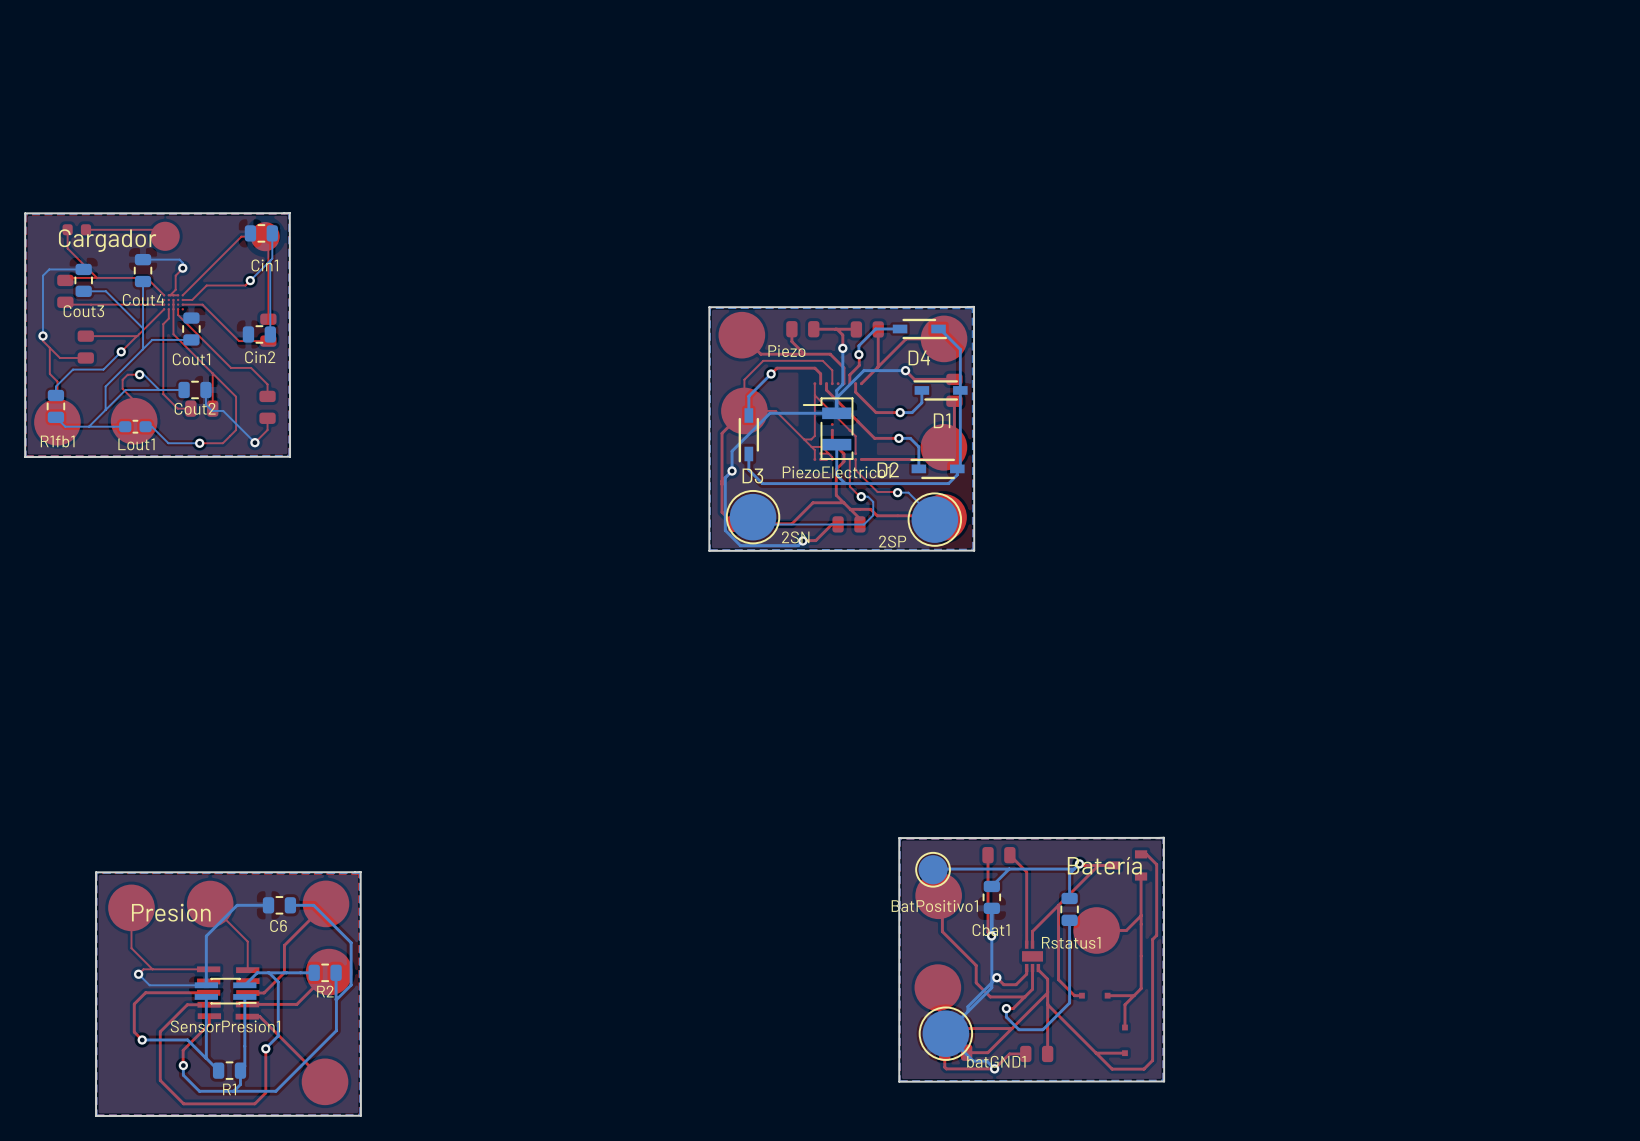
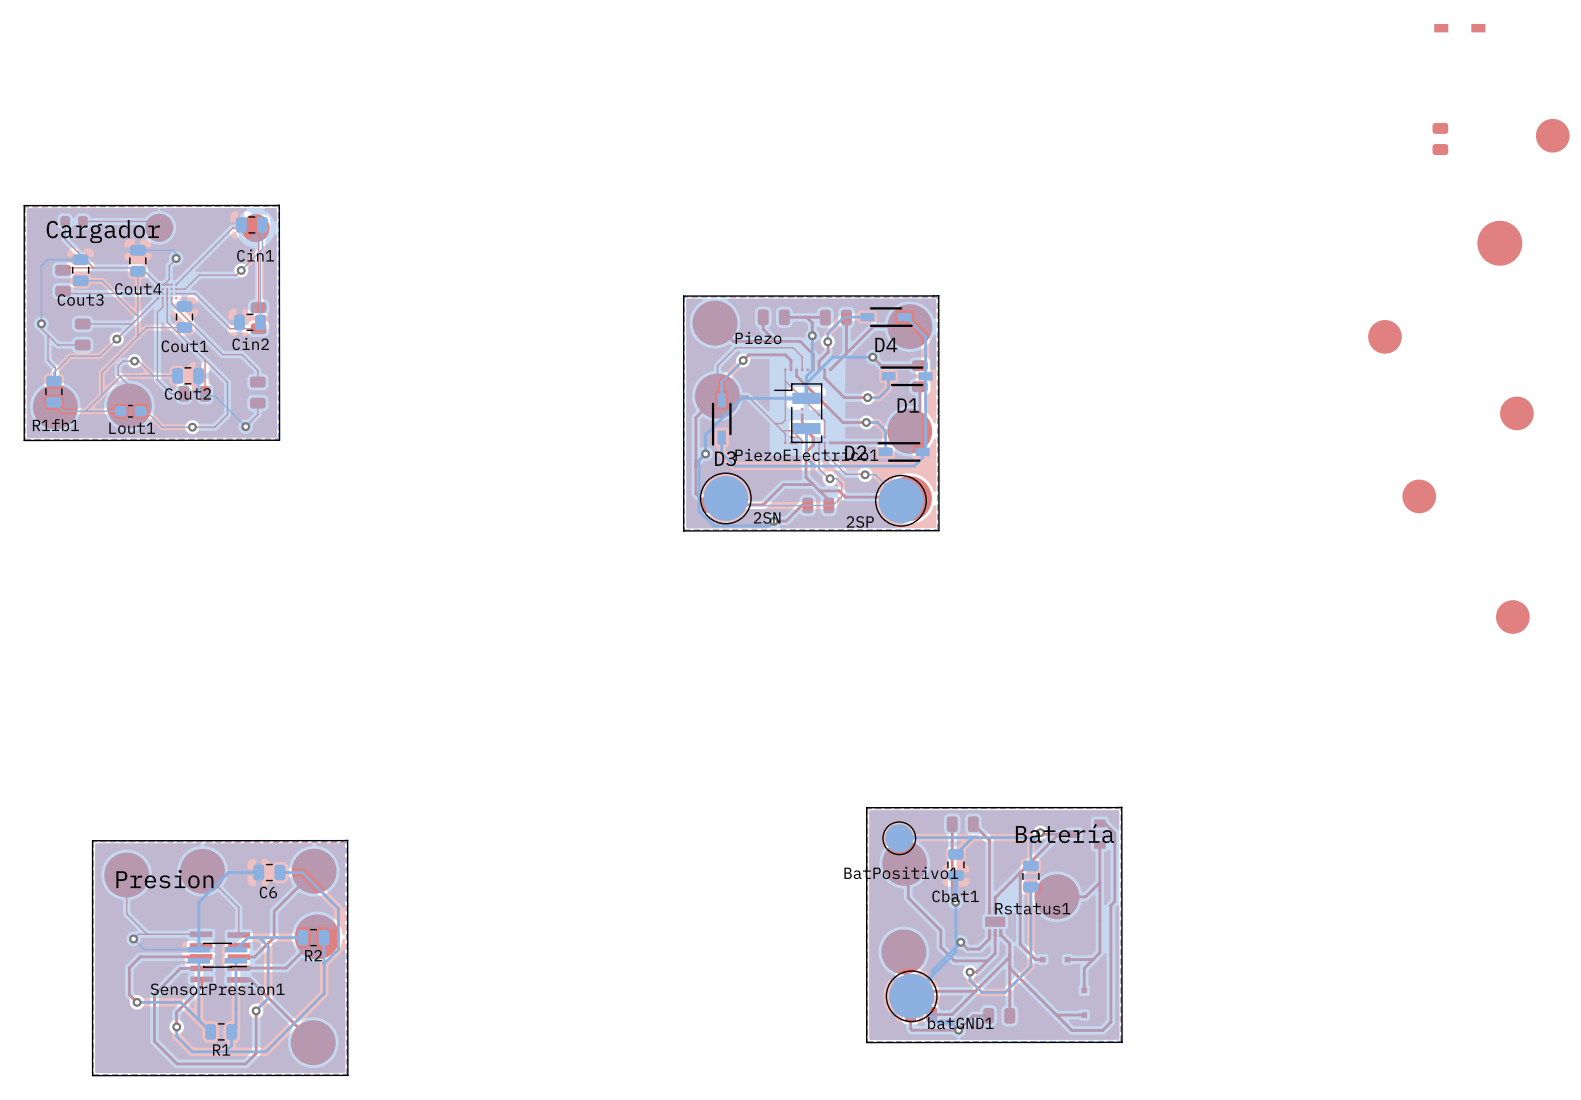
part: none -> (1459, 28)
part: none -> (1552, 135)
part: none -> (1440, 138)
part: none -> (1499, 243)
part: none -> (1384, 336)
part: none -> (1516, 413)
part: none -> (1419, 496)
part: none -> (1512, 617)

